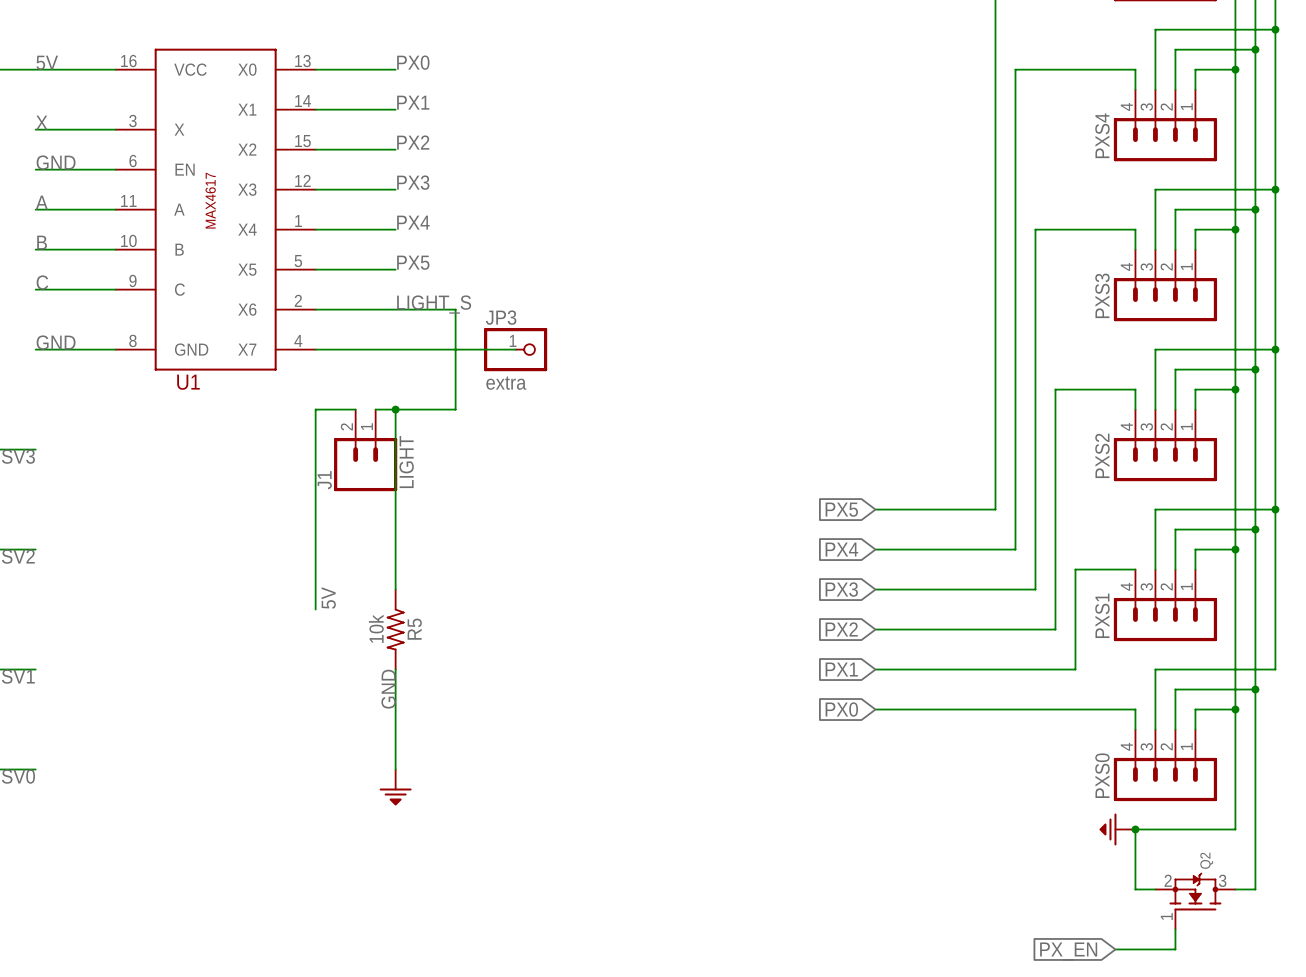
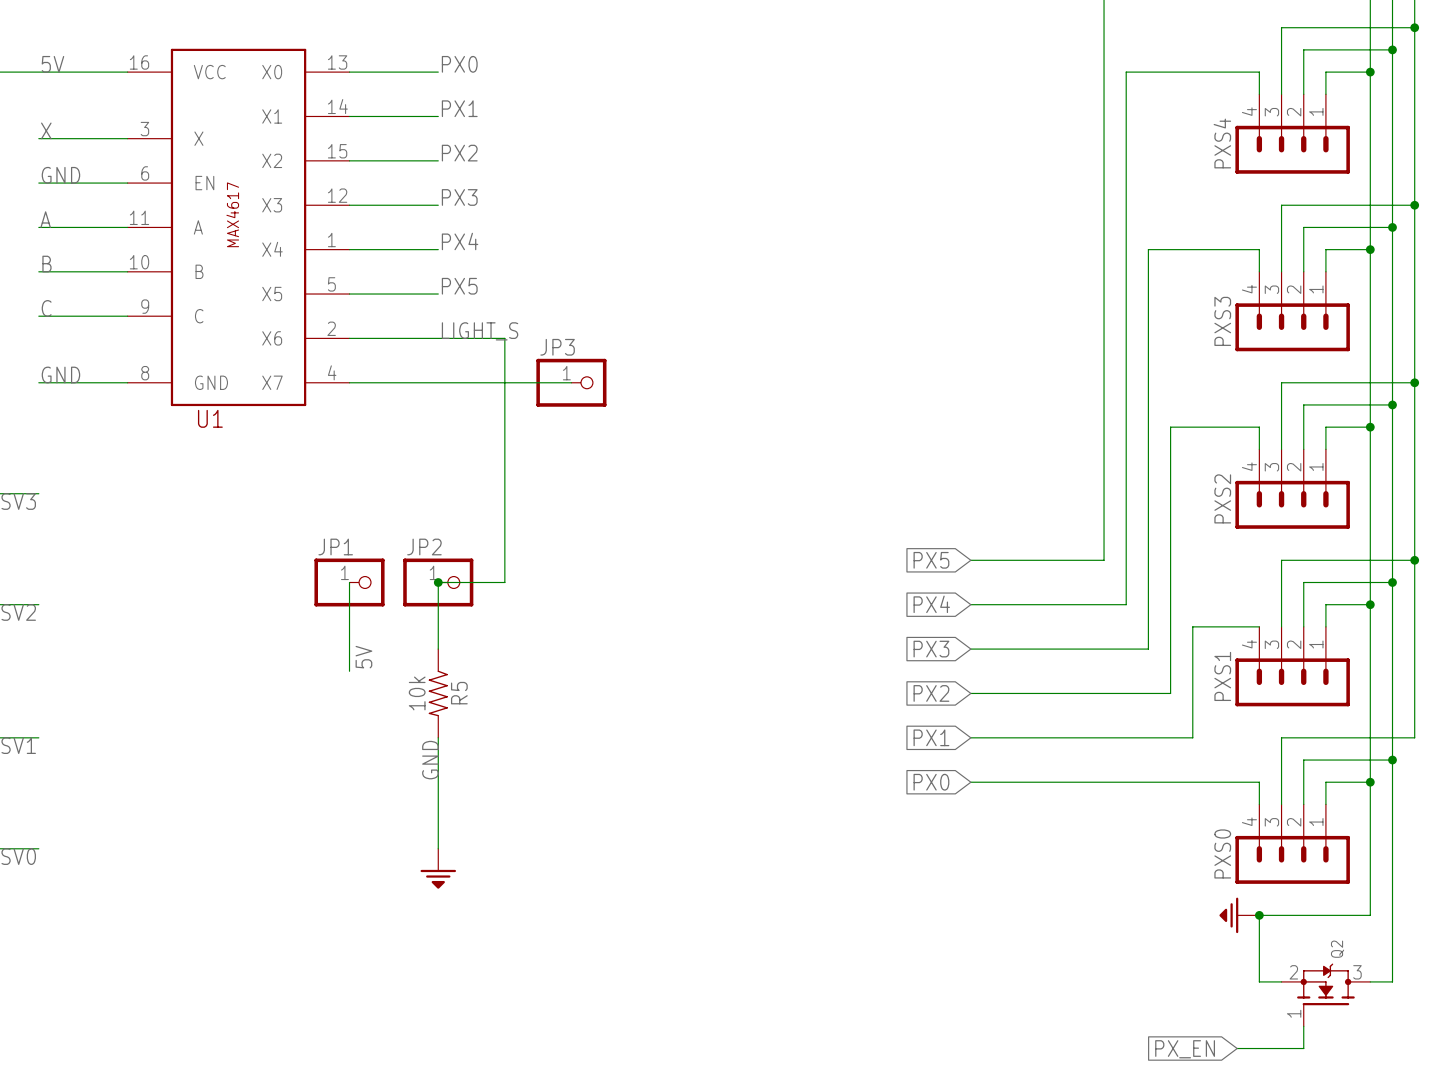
JP3 value: extra (506, 383) -> none
wire: (355, 409) (315, 409) (315, 529) -> none
wire: (375, 409) (455, 409) -> none
wire: (395, 409) (395, 529) -> (504, 449) (504, 582) (438, 582)
junction: (395, 409) -> none
J1: LIGHT (365, 450) -> none
JP1: none -> (349, 582)
JP2: none -> (438, 582)
junction: none -> (438, 582)

